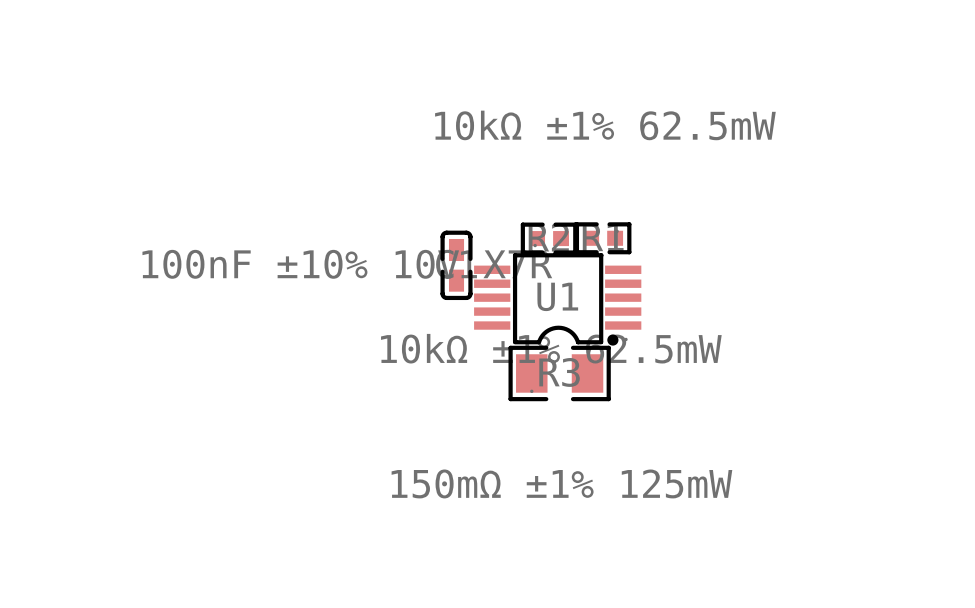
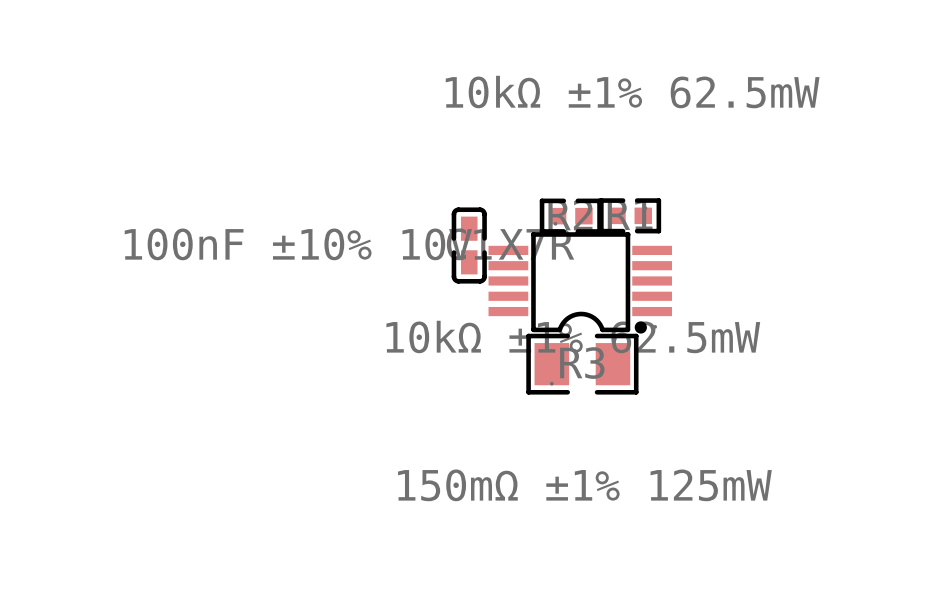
U1 name: U1 (557, 296) -> none

